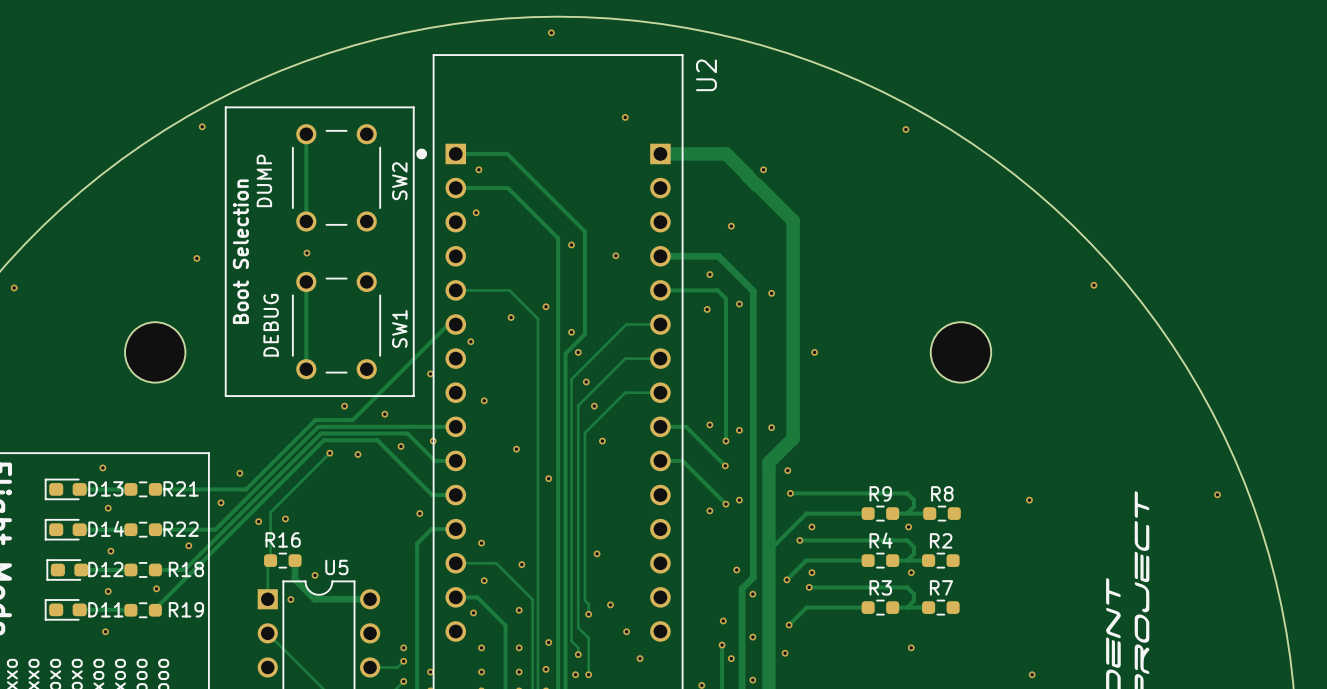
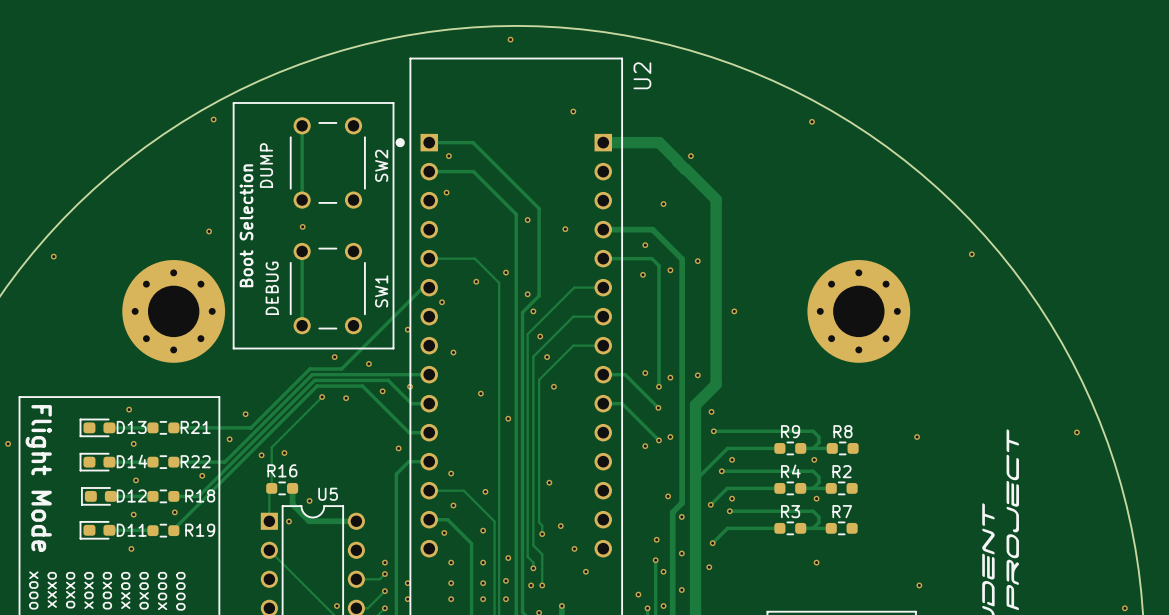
part footprint: [125, 322, 186, 383] -> [122, 260, 226, 363]
part footprint: [930, 322, 992, 383] -> [807, 260, 911, 363]

